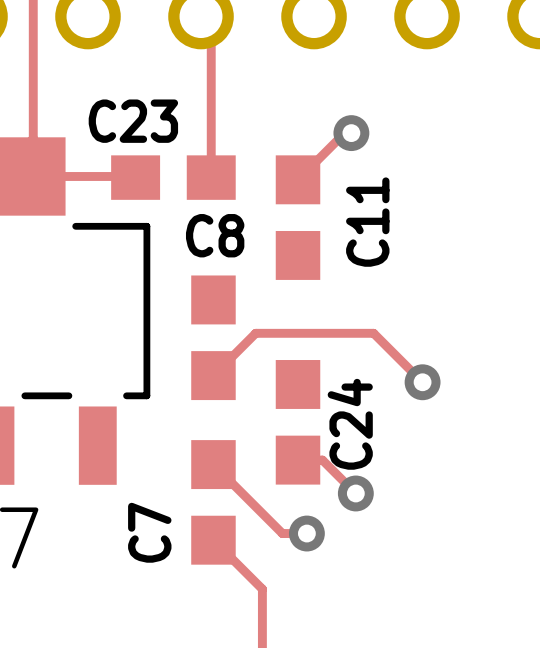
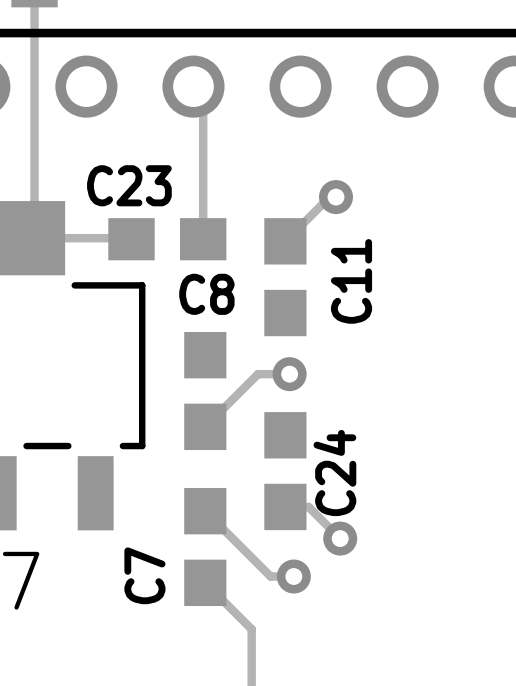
track: (255, 333) (373, 333) (422, 382) -> (245, 386) (257, 374) (289, 374)
via position: (422, 382) -> (289, 374)

